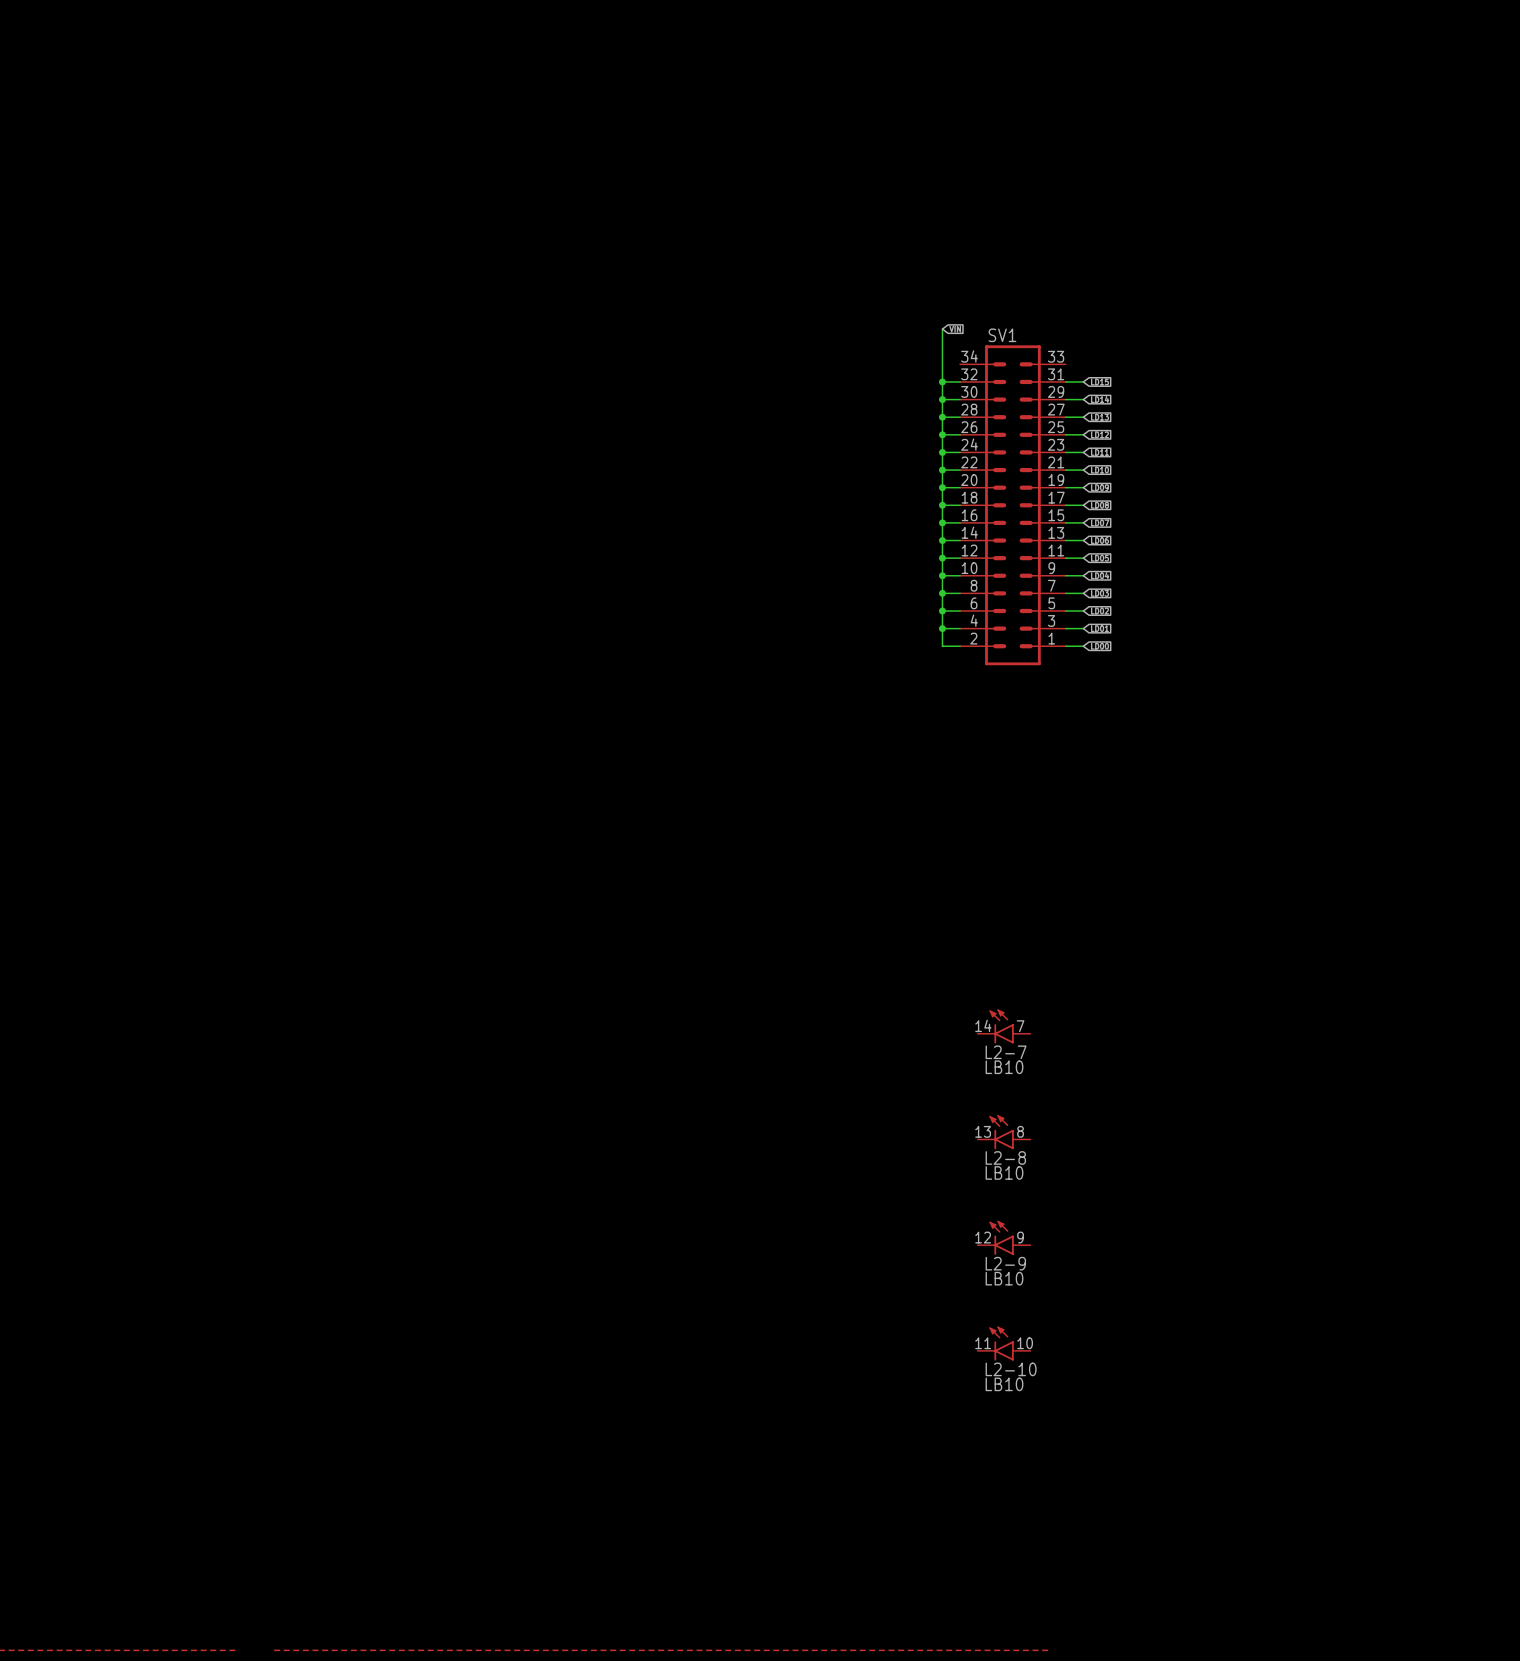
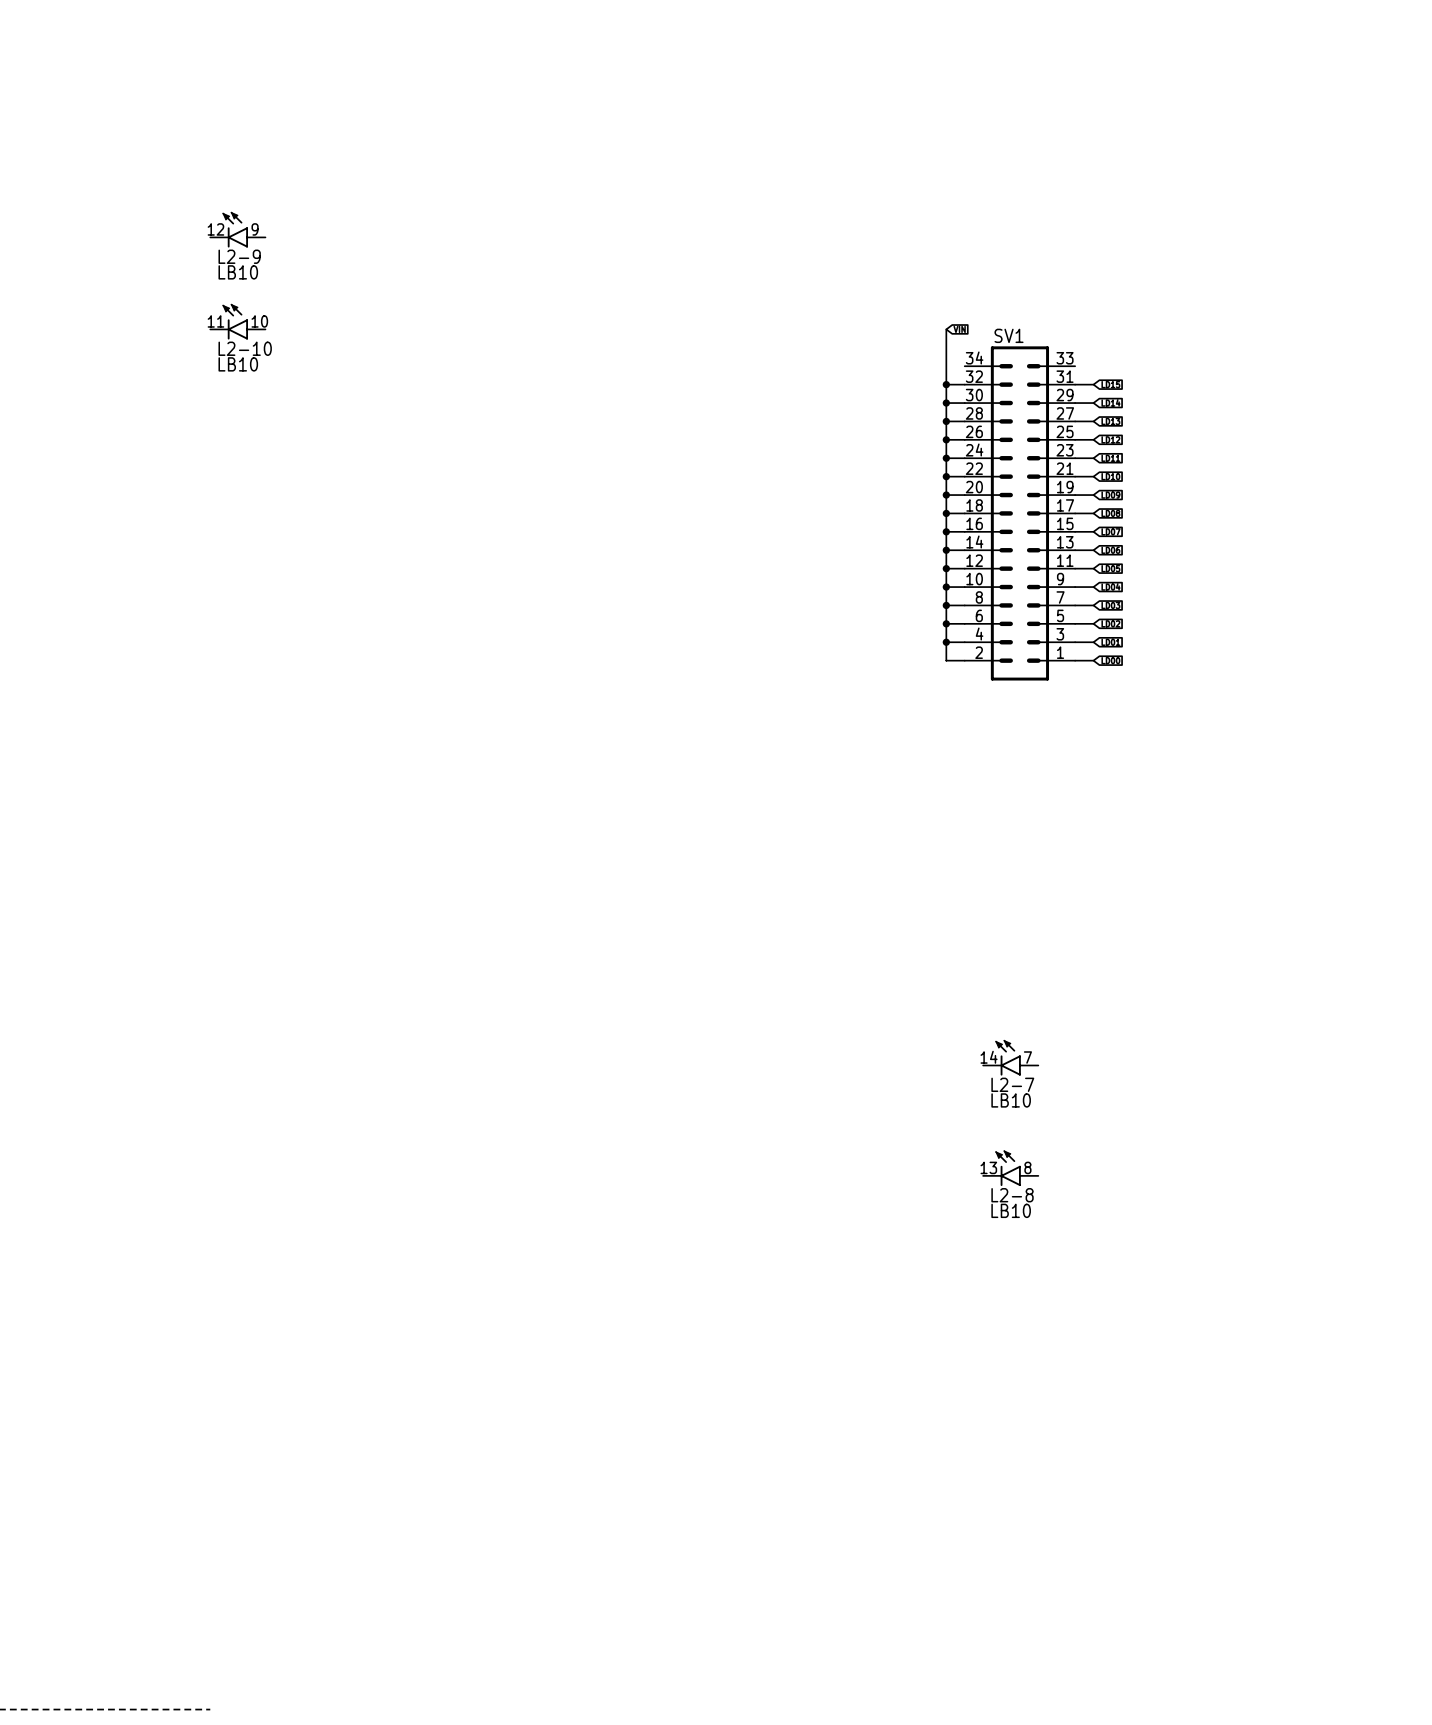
L2-9 position: (1004, 1237) -> (237, 229)
L2-10 position: (1004, 1343) -> (237, 321)
line: (273, 1650) (1048, 1650) -> none

